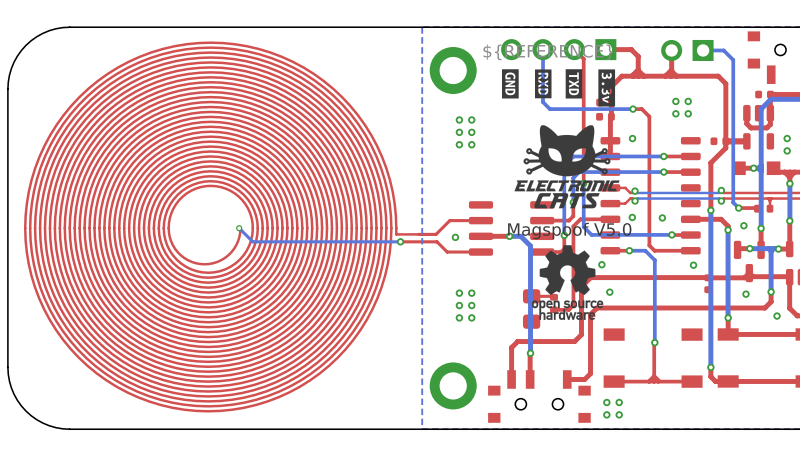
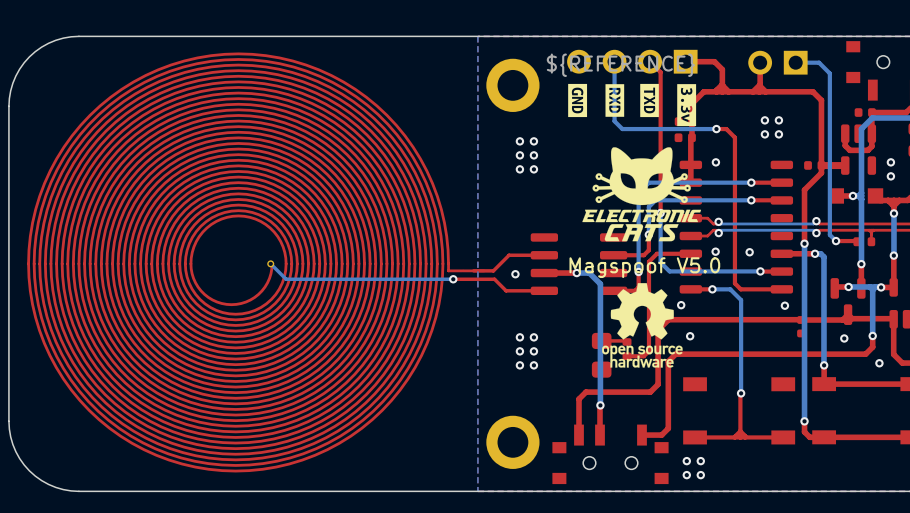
top track: (720, 219) (728, 226) (728, 230) -> none
bottom track: none -> (815, 253) (820, 253) (823, 257) (823, 265)
via: none -> (815, 253)
via: (743, 225) -> none
via: (728, 230) -> none

